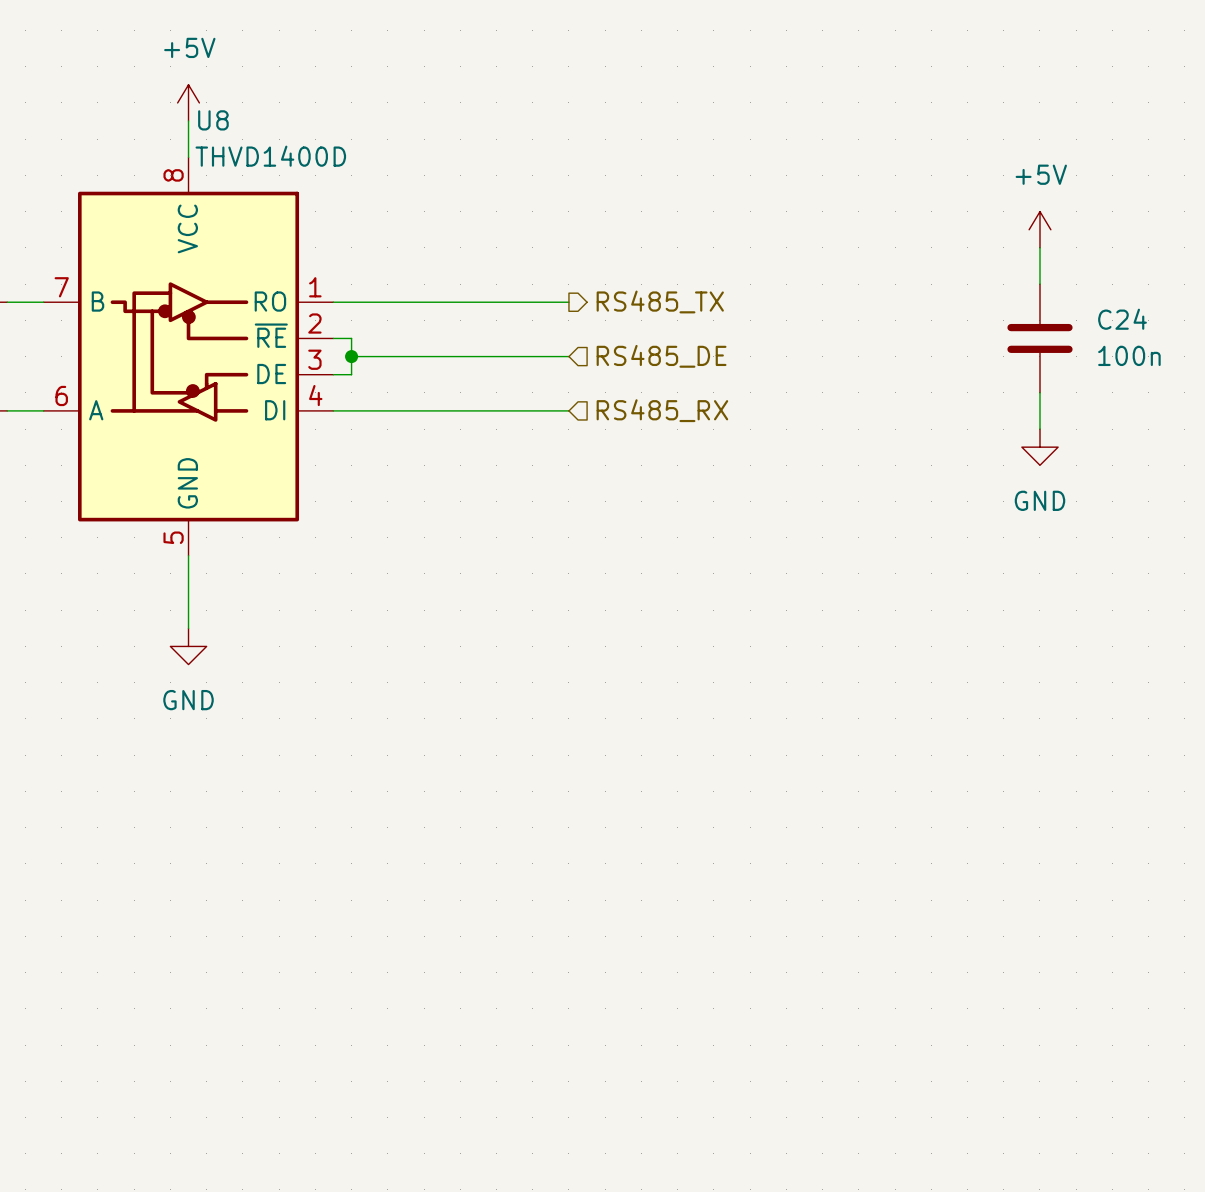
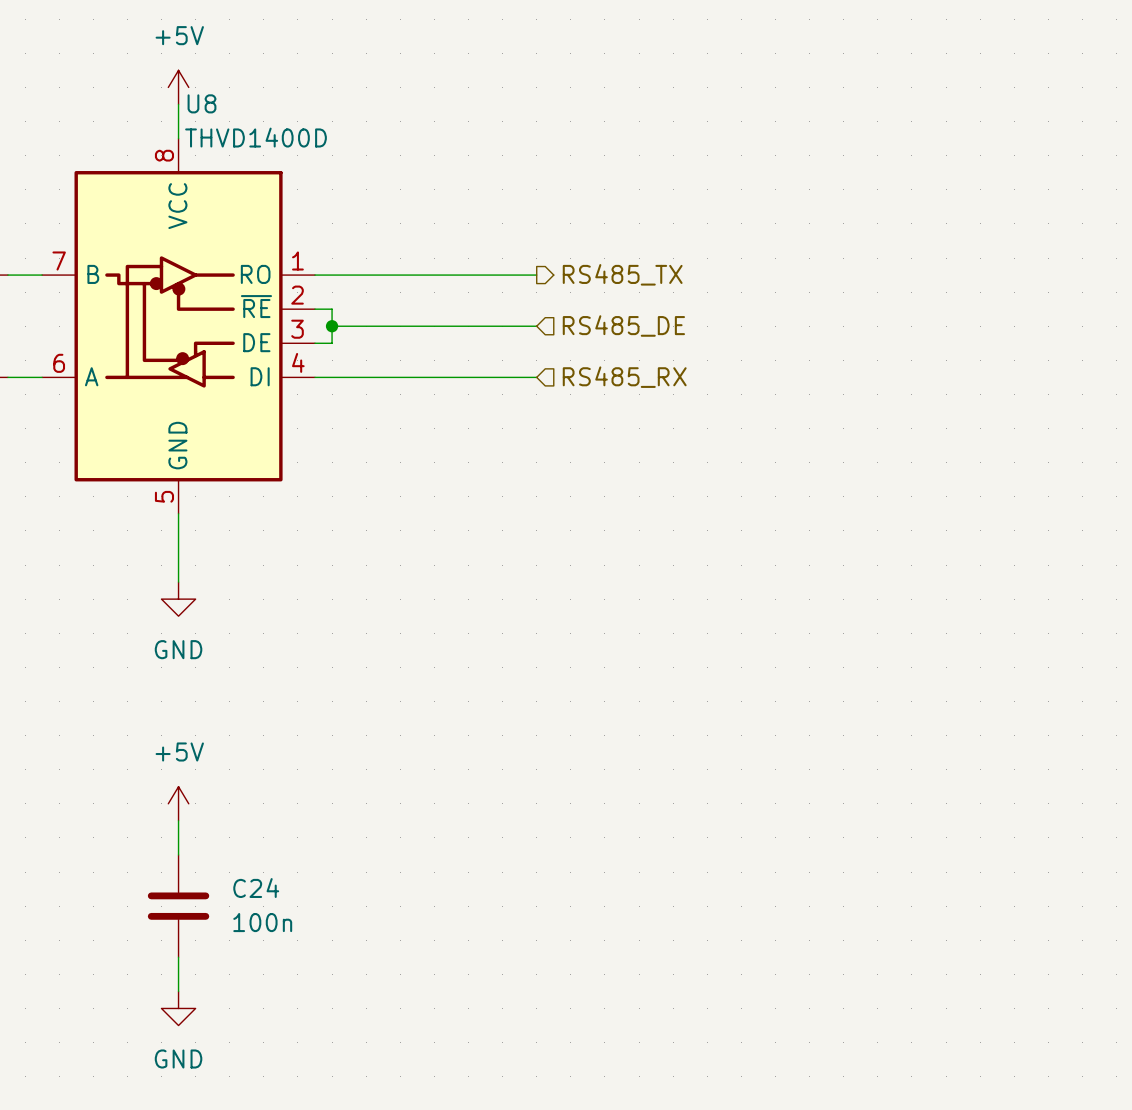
power symbol: +5V (1039, 229) -> none
wire: (1039, 247) (1039, 284) -> none
C24 position: (1039, 338) -> (178, 906)
wire: (1039, 392) (1039, 429) -> none
power symbol: GND (1039, 447) -> none
power symbol: none -> +5V (178, 803)
wire: none -> (178, 820) (178, 854)
wire: none -> (178, 957) (178, 991)
power symbol: none -> GND (178, 1008)

